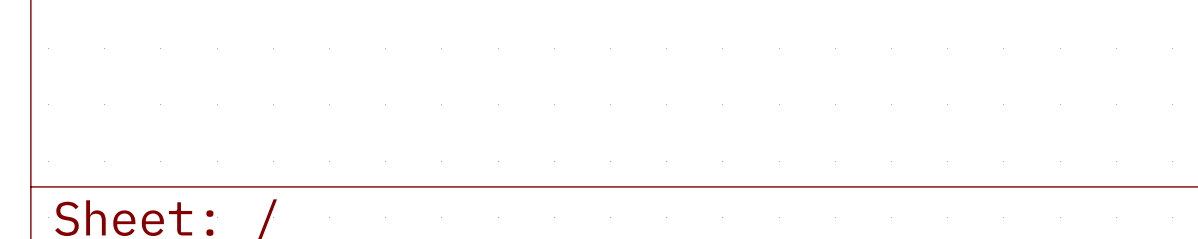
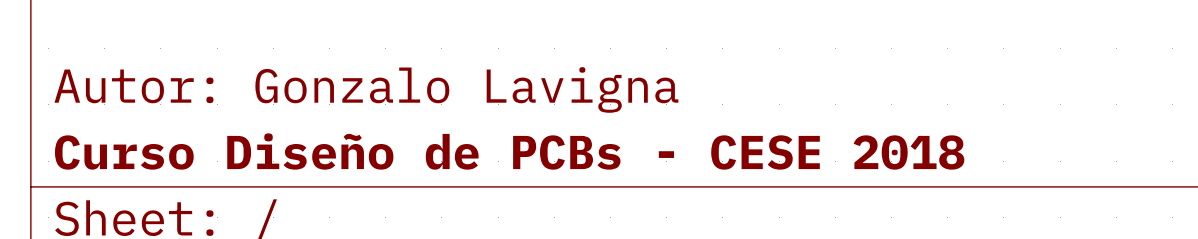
title block: none -> Autor: Gonzalo Lavigna (366, 89)
title block: none -> Curso Diseño de PCBs - CESE 2018 (509, 151)

